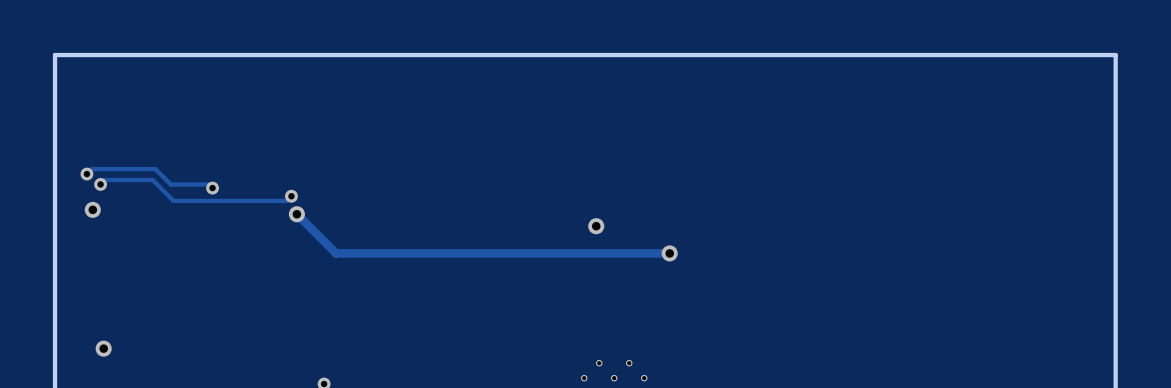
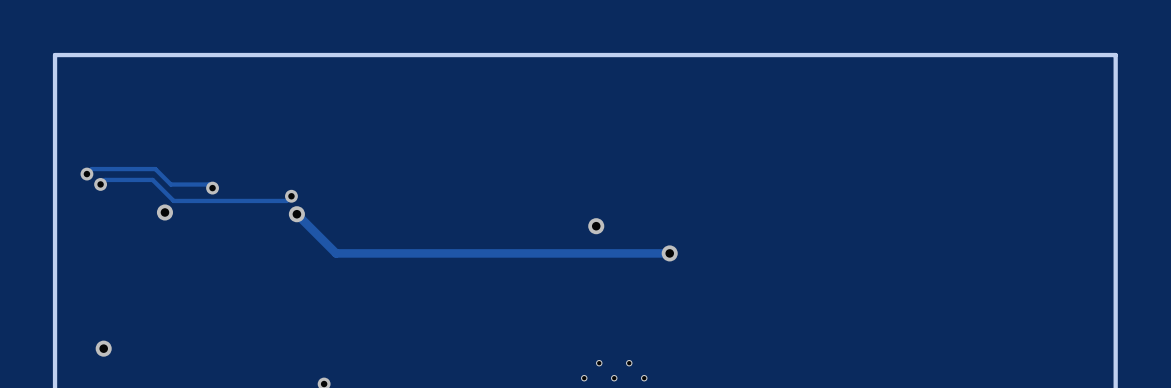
via position: (92, 209) -> (164, 212)

